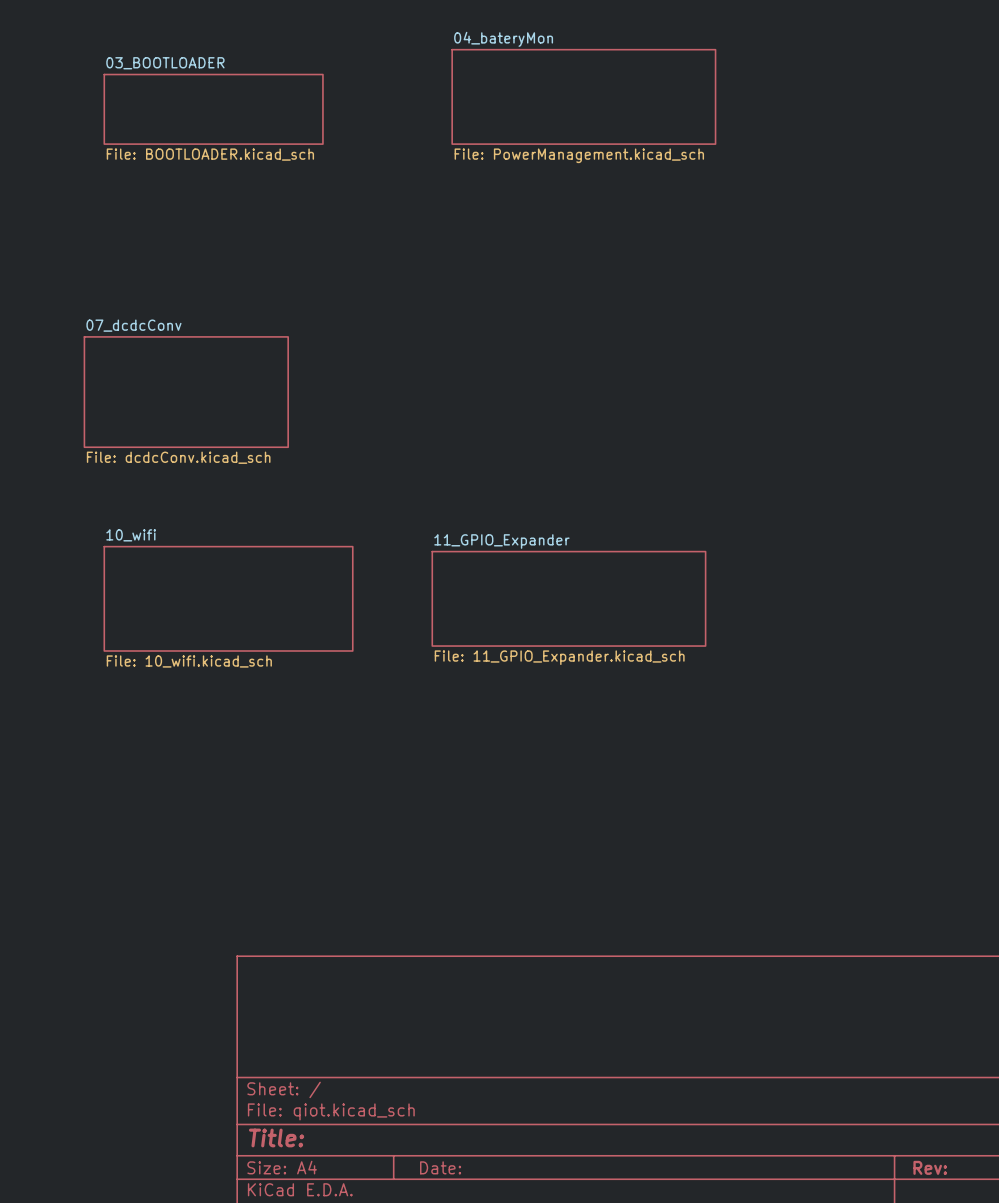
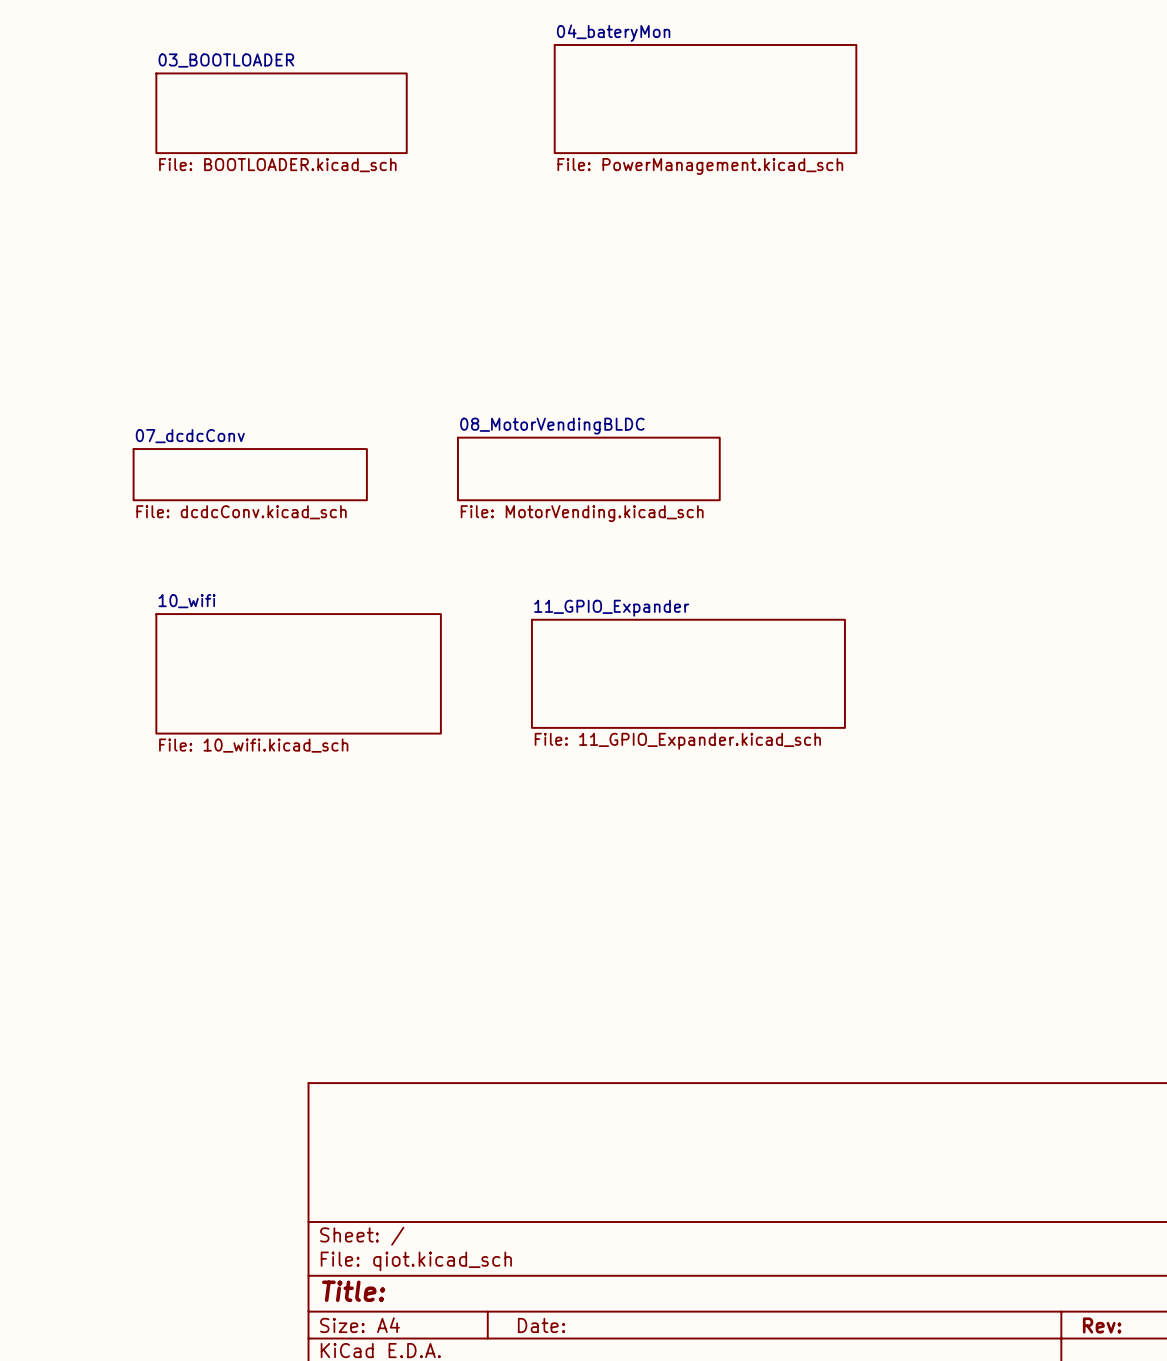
sheet 07_dcdcConv name position: 07_dcdcConv (133, 325) -> 07_dcdcConv (190, 436)
sheet 07_dcdcConv shape: [83, 336, 289, 448] -> [132, 448, 368, 501]
sheet 08_MotorVendingBLDC: none -> File: MotorVending.kicad_sch (588, 468)

